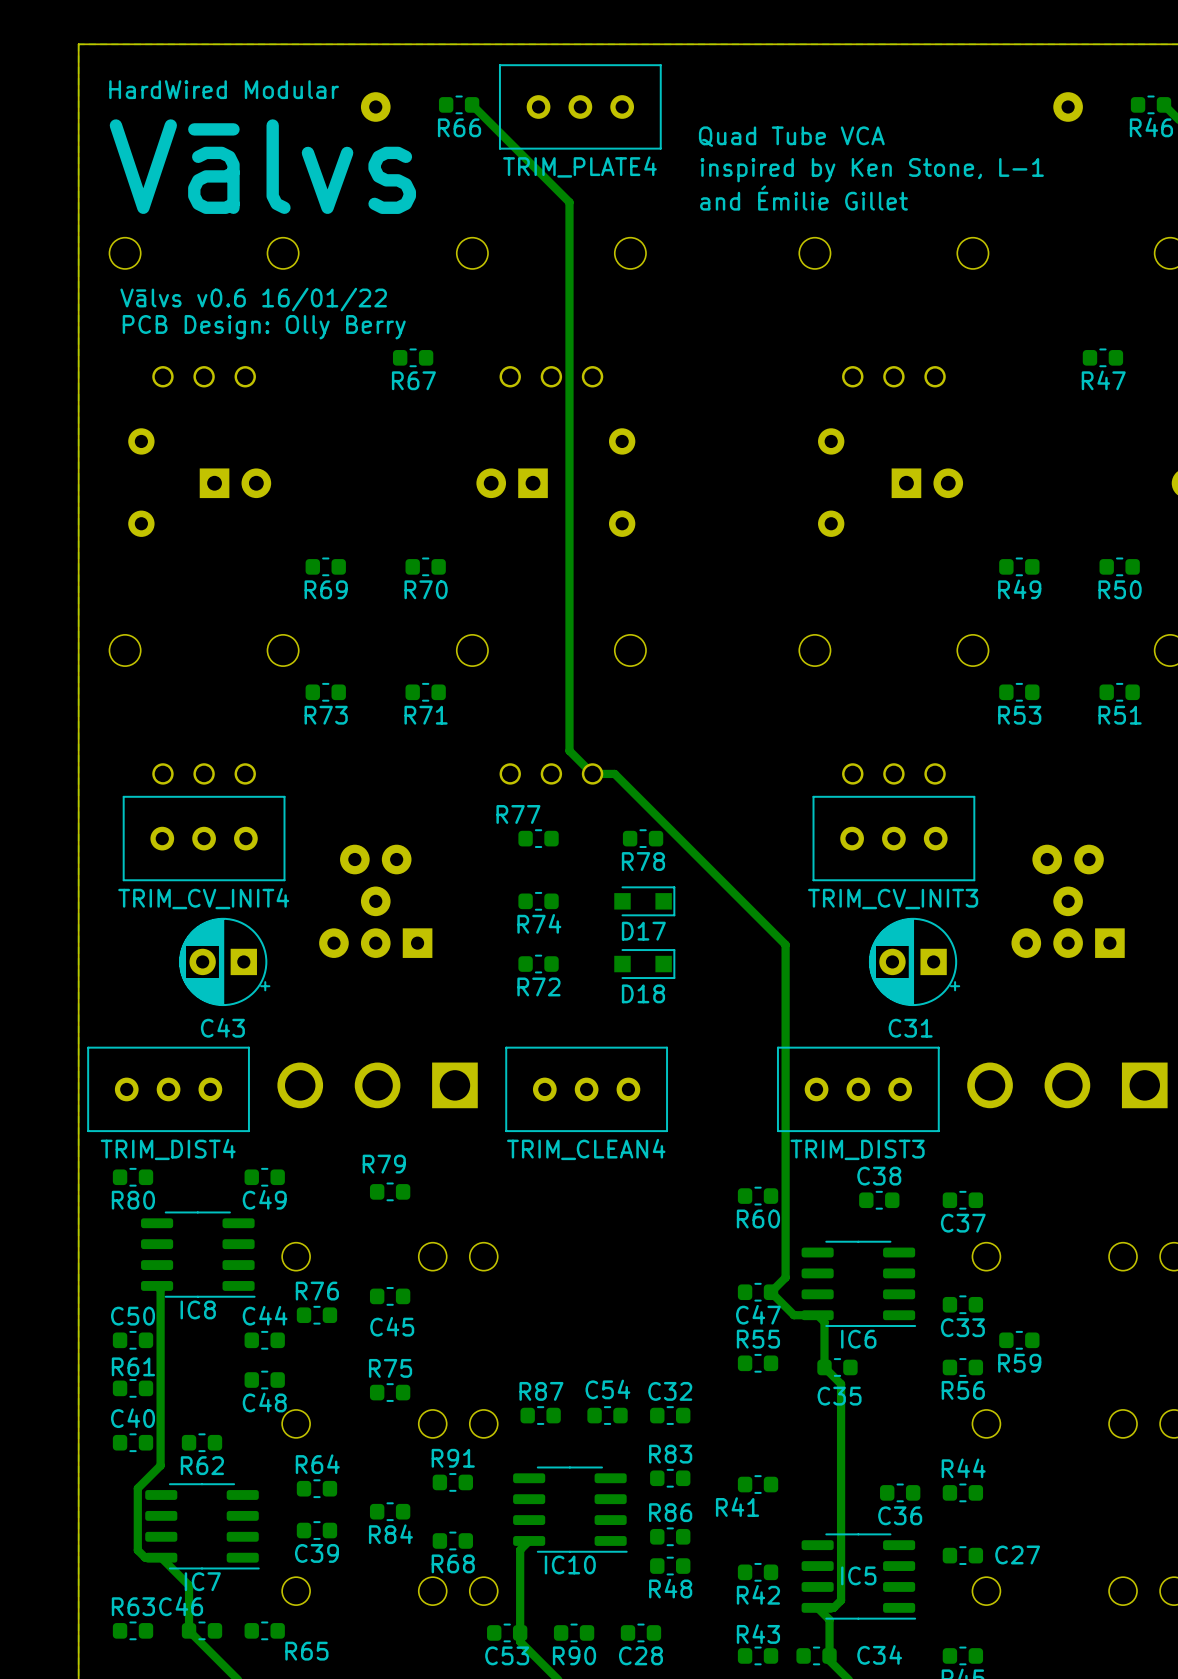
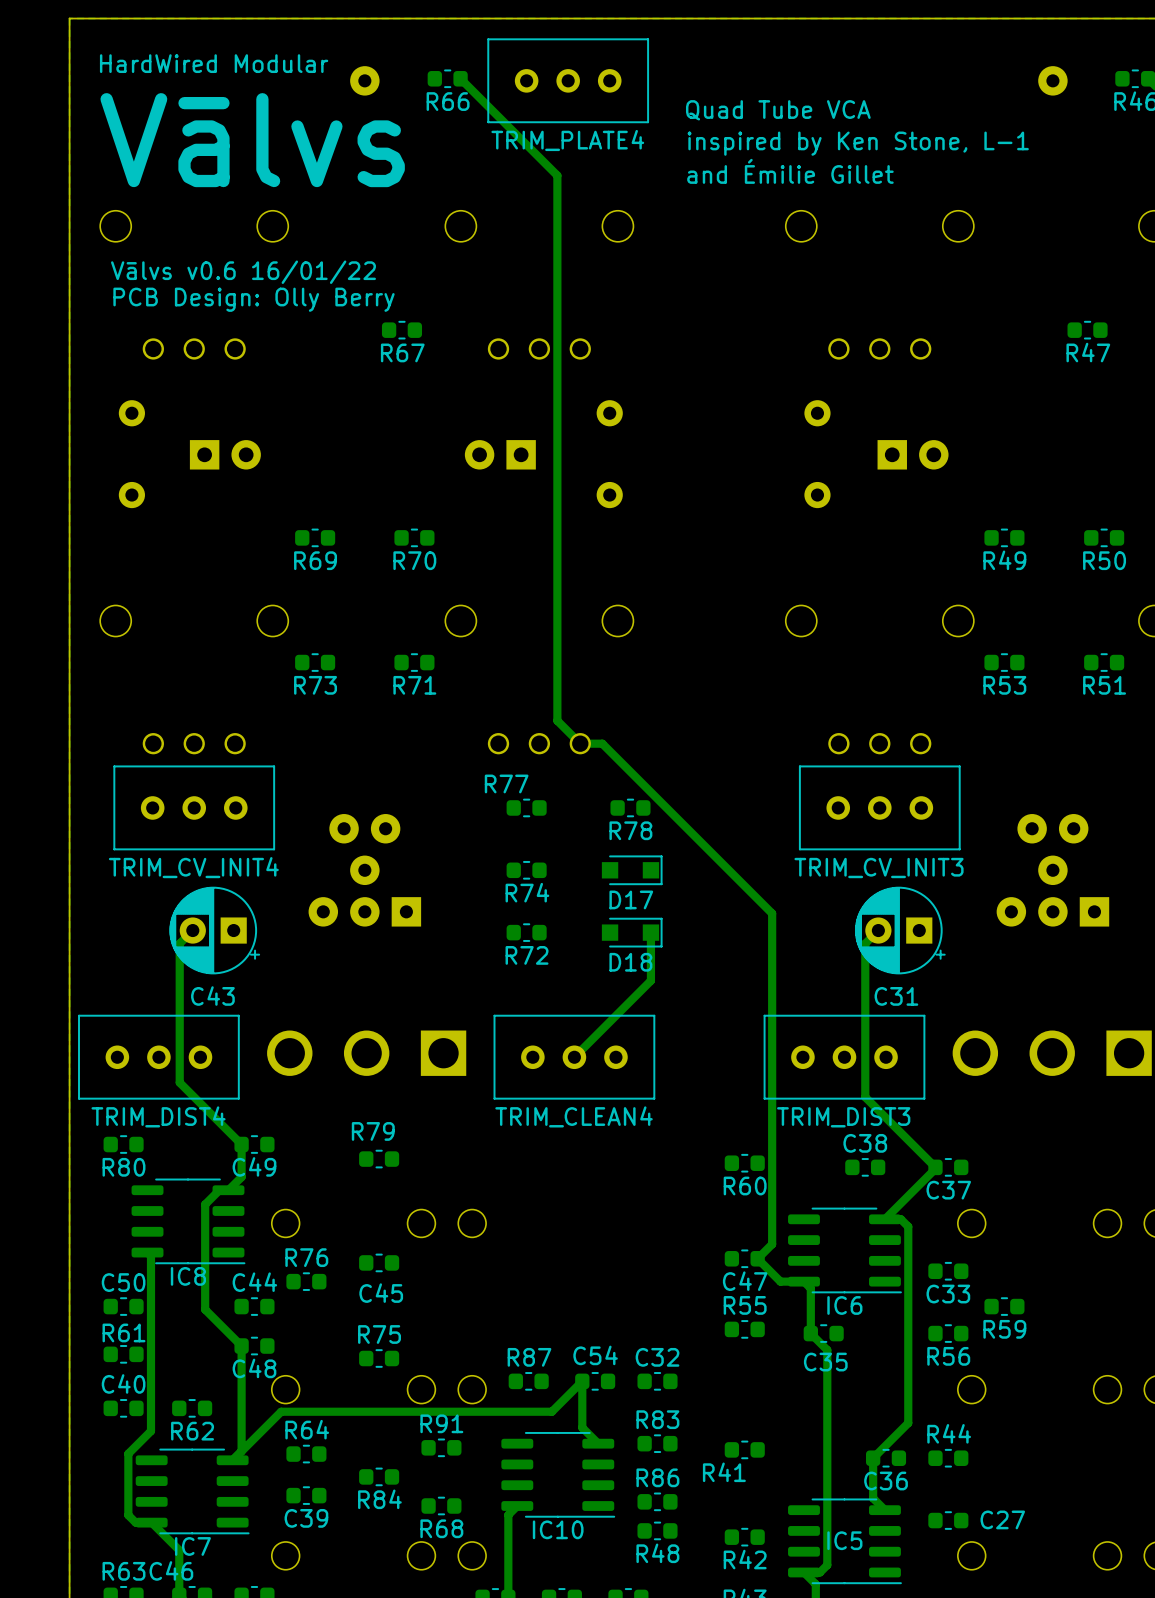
track: none -> (192, 930) (179, 943) (179, 1082) (241, 1144) (241, 1177) (228, 1190) (219, 1190) (205, 1204) (205, 1309) (241, 1346) (241, 1451)
track: none -> (878, 930) (865, 943) (865, 1097) (935, 1167) (884, 1219) (900, 1219) (908, 1226) (908, 1423) (873, 1458) (873, 1498) (884, 1510)
track: none -> (650, 932) (650, 980) (574, 1057)
track: none -> (598, 1443) (582, 1427) (582, 1381) (551, 1411) (281, 1411) (232, 1460)

